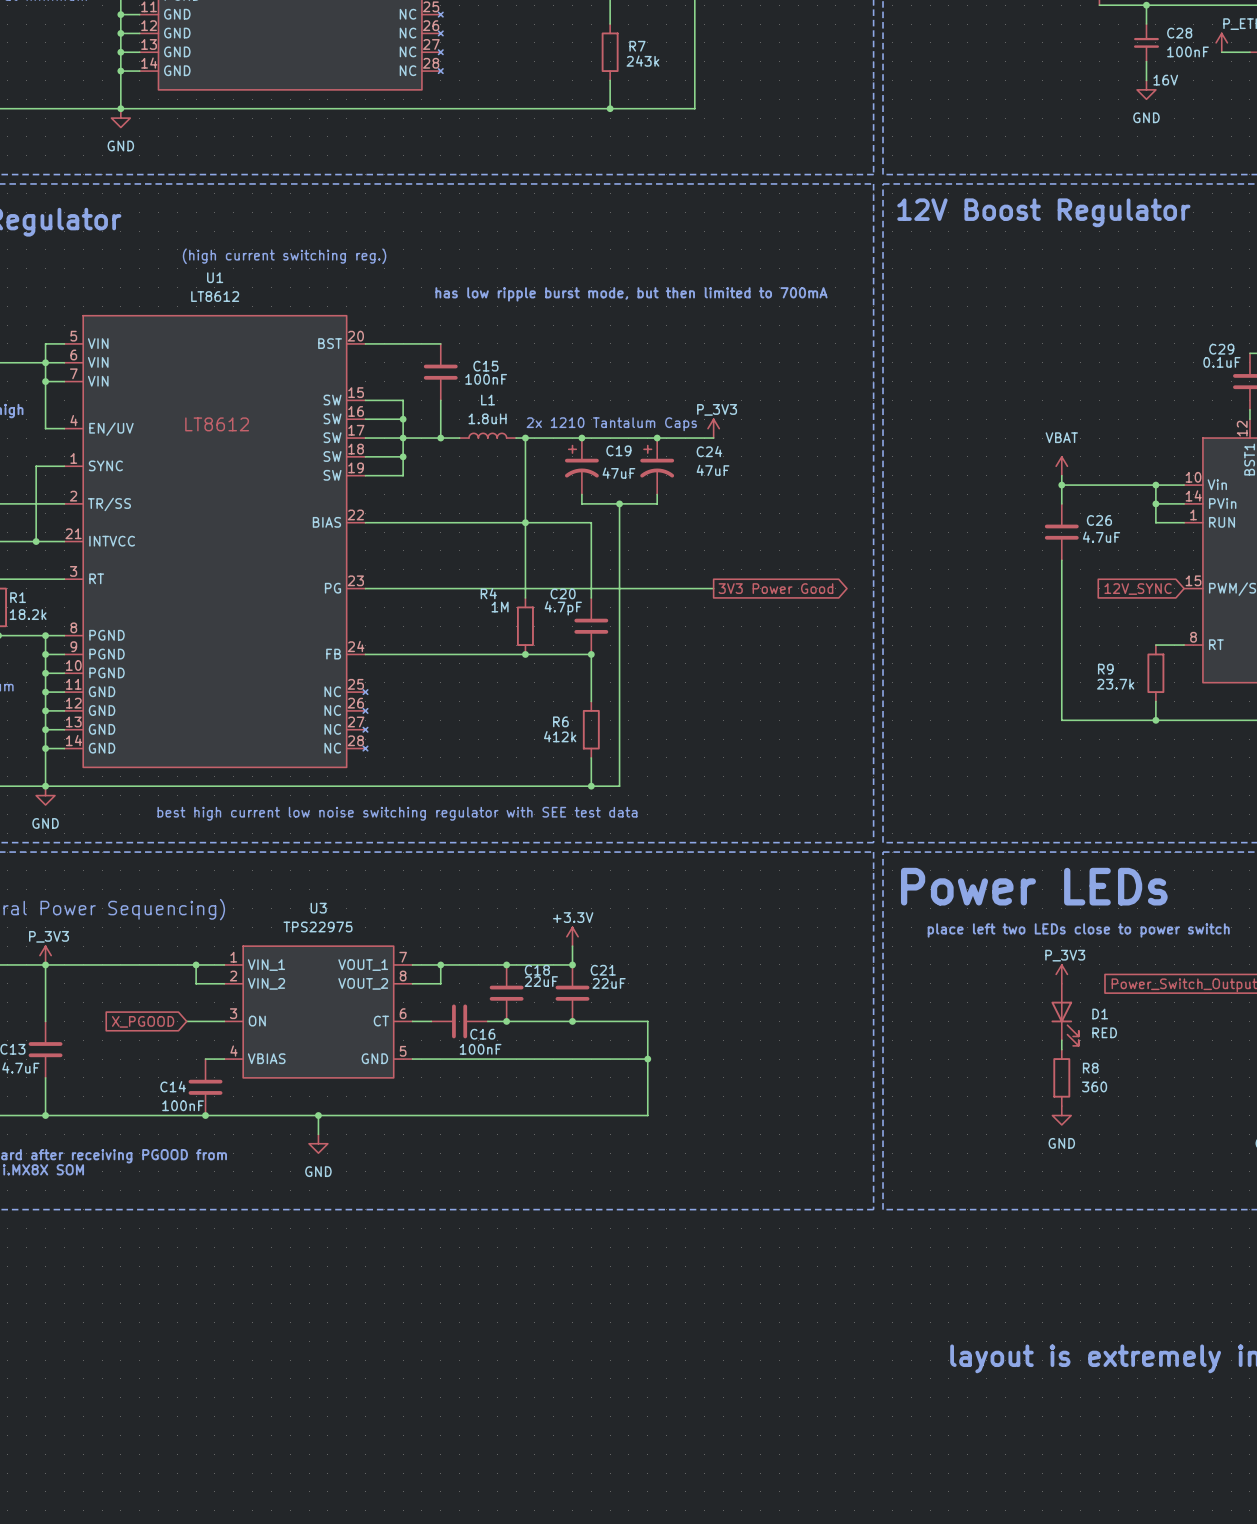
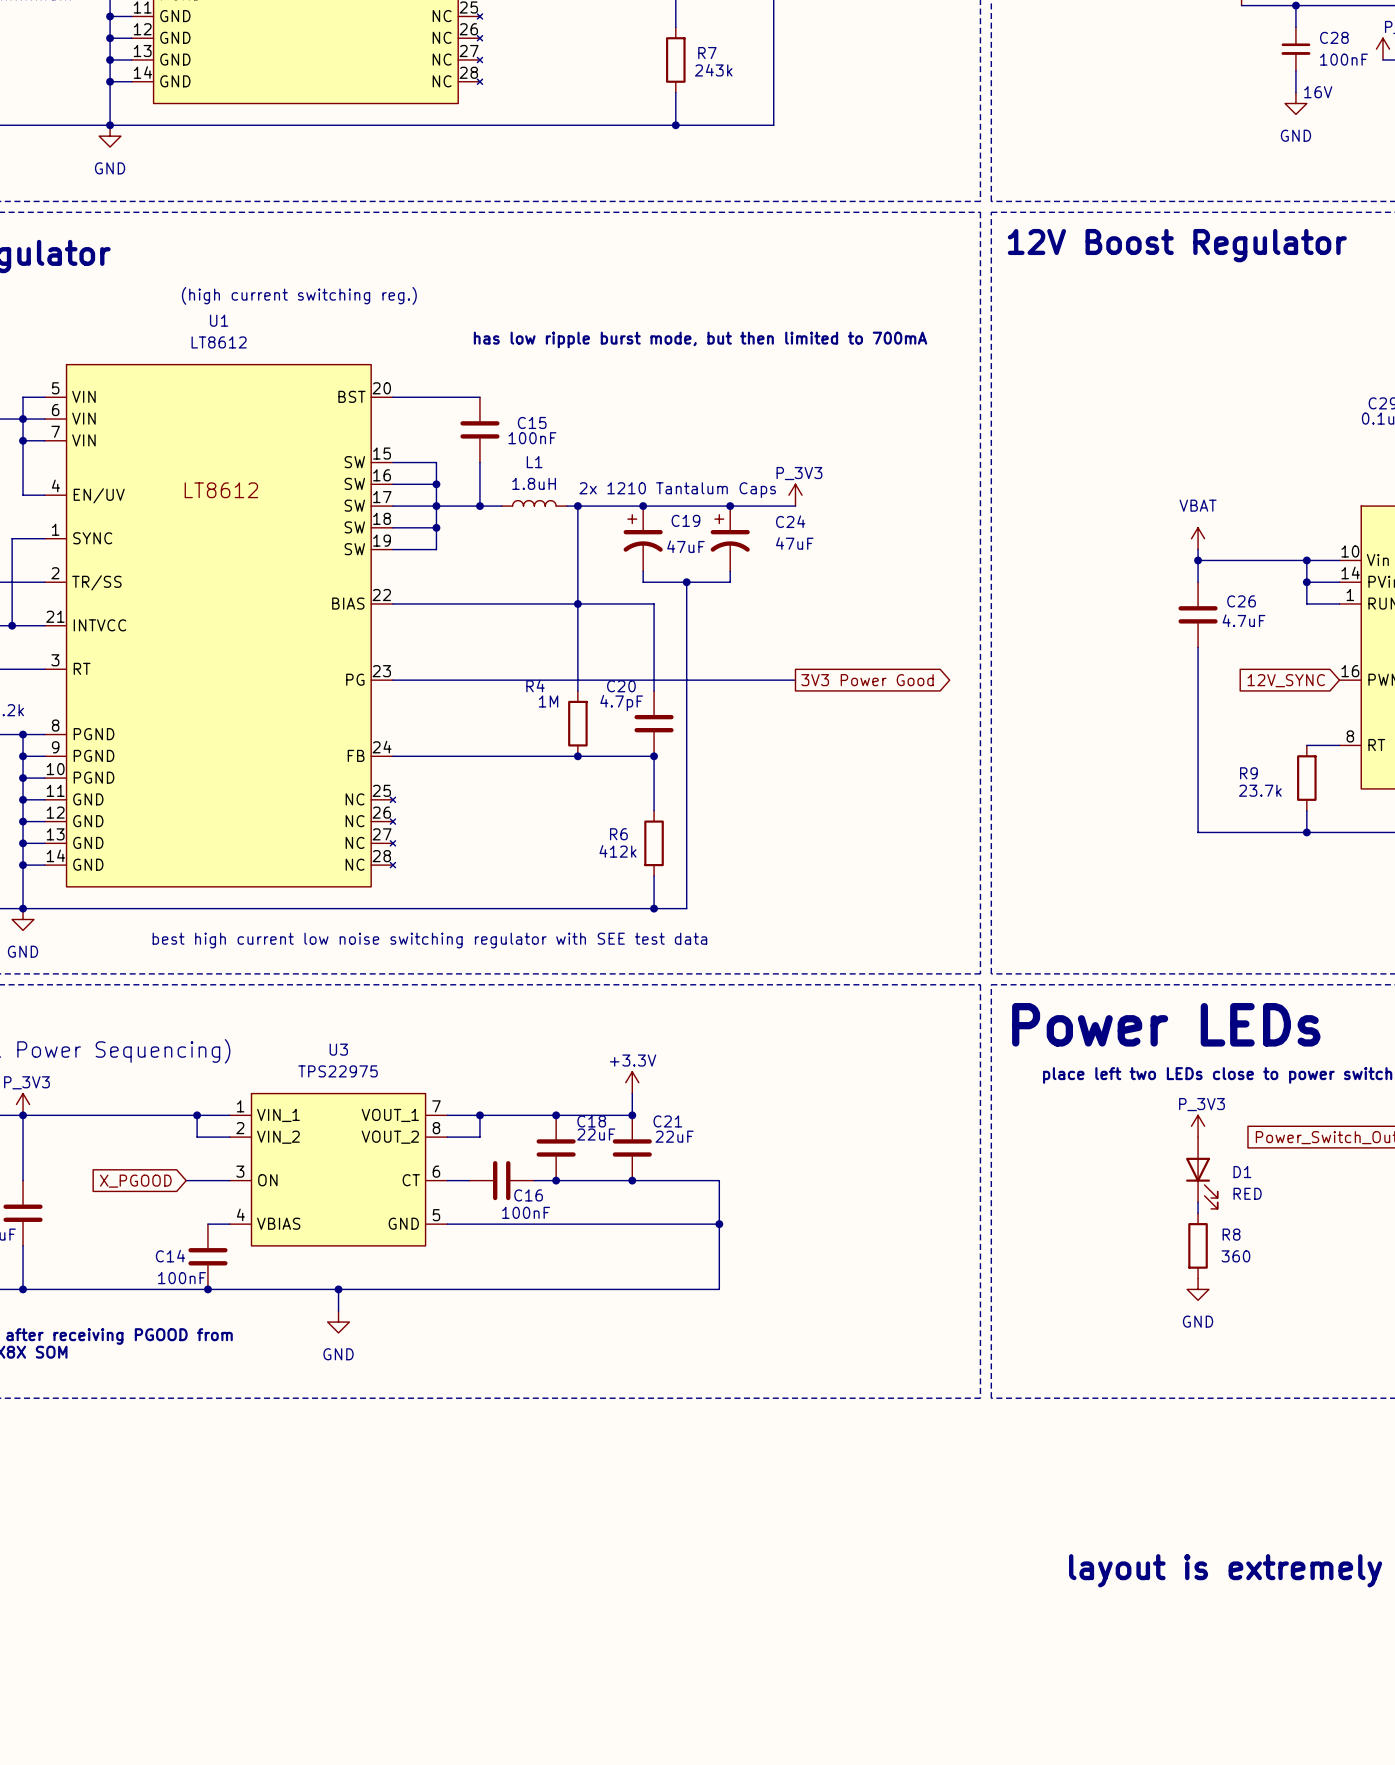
part pin number: 15 (1193, 580) -> 16 (1350, 671)

